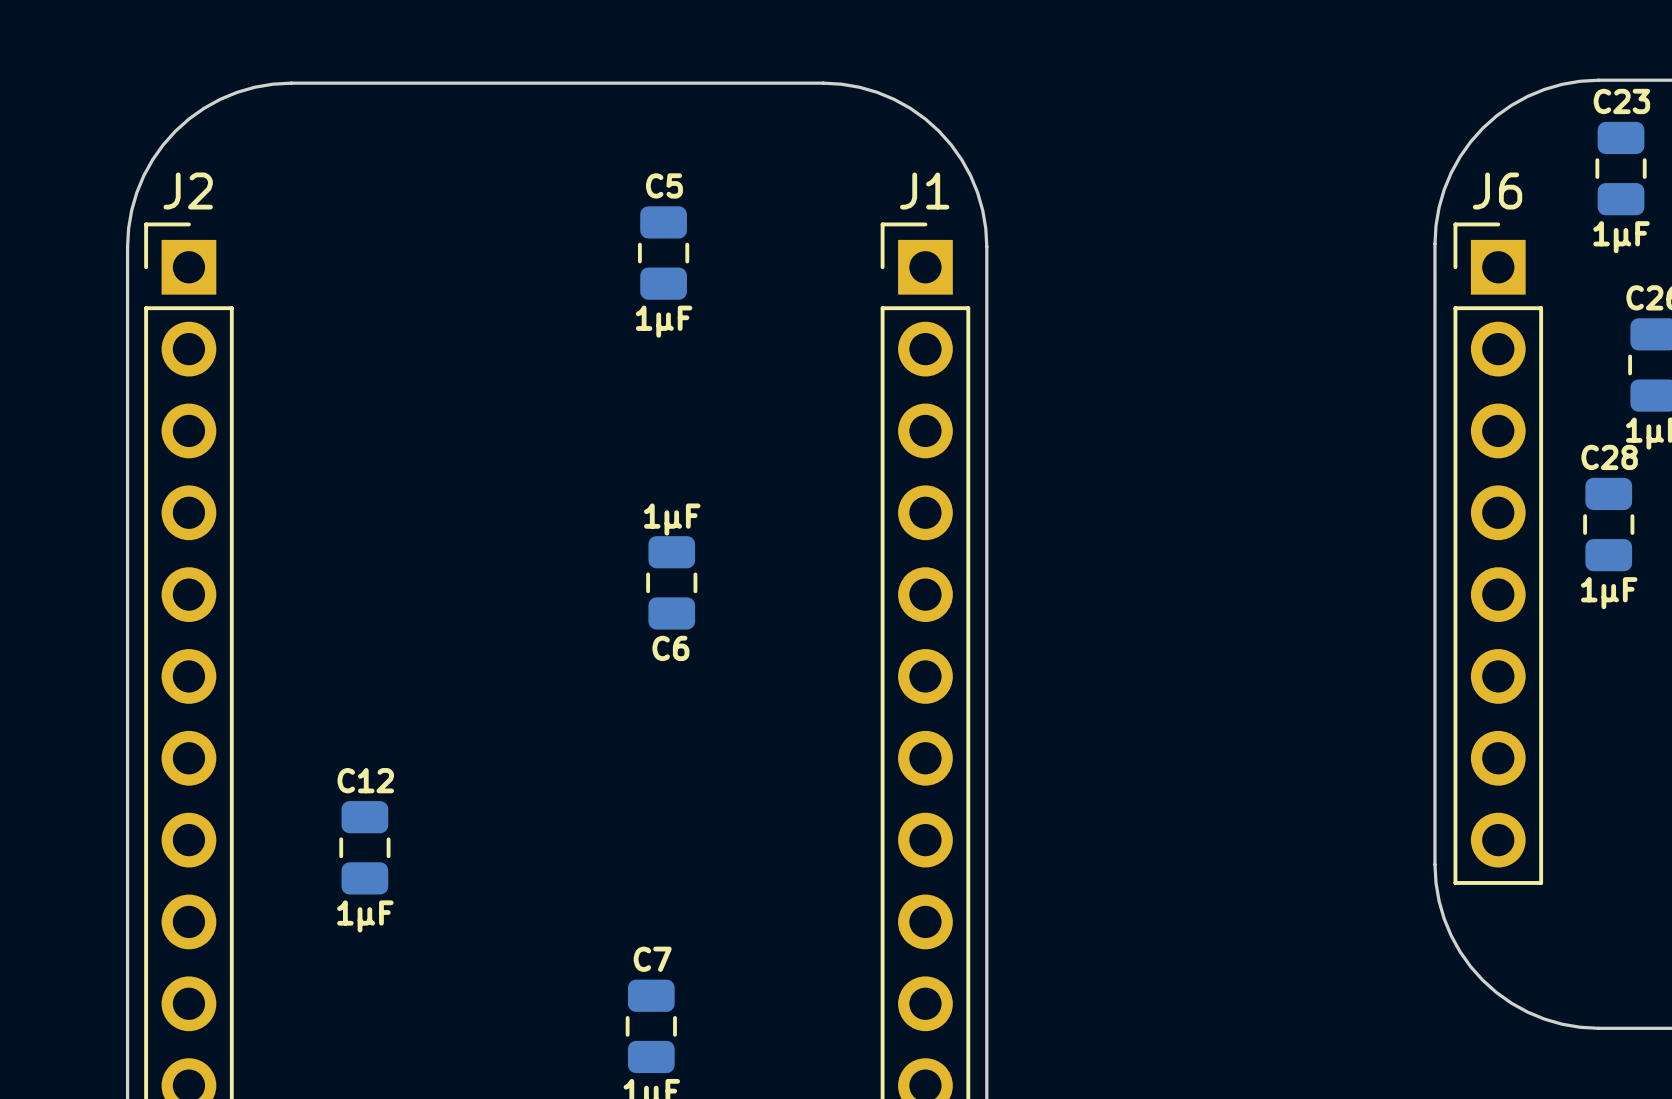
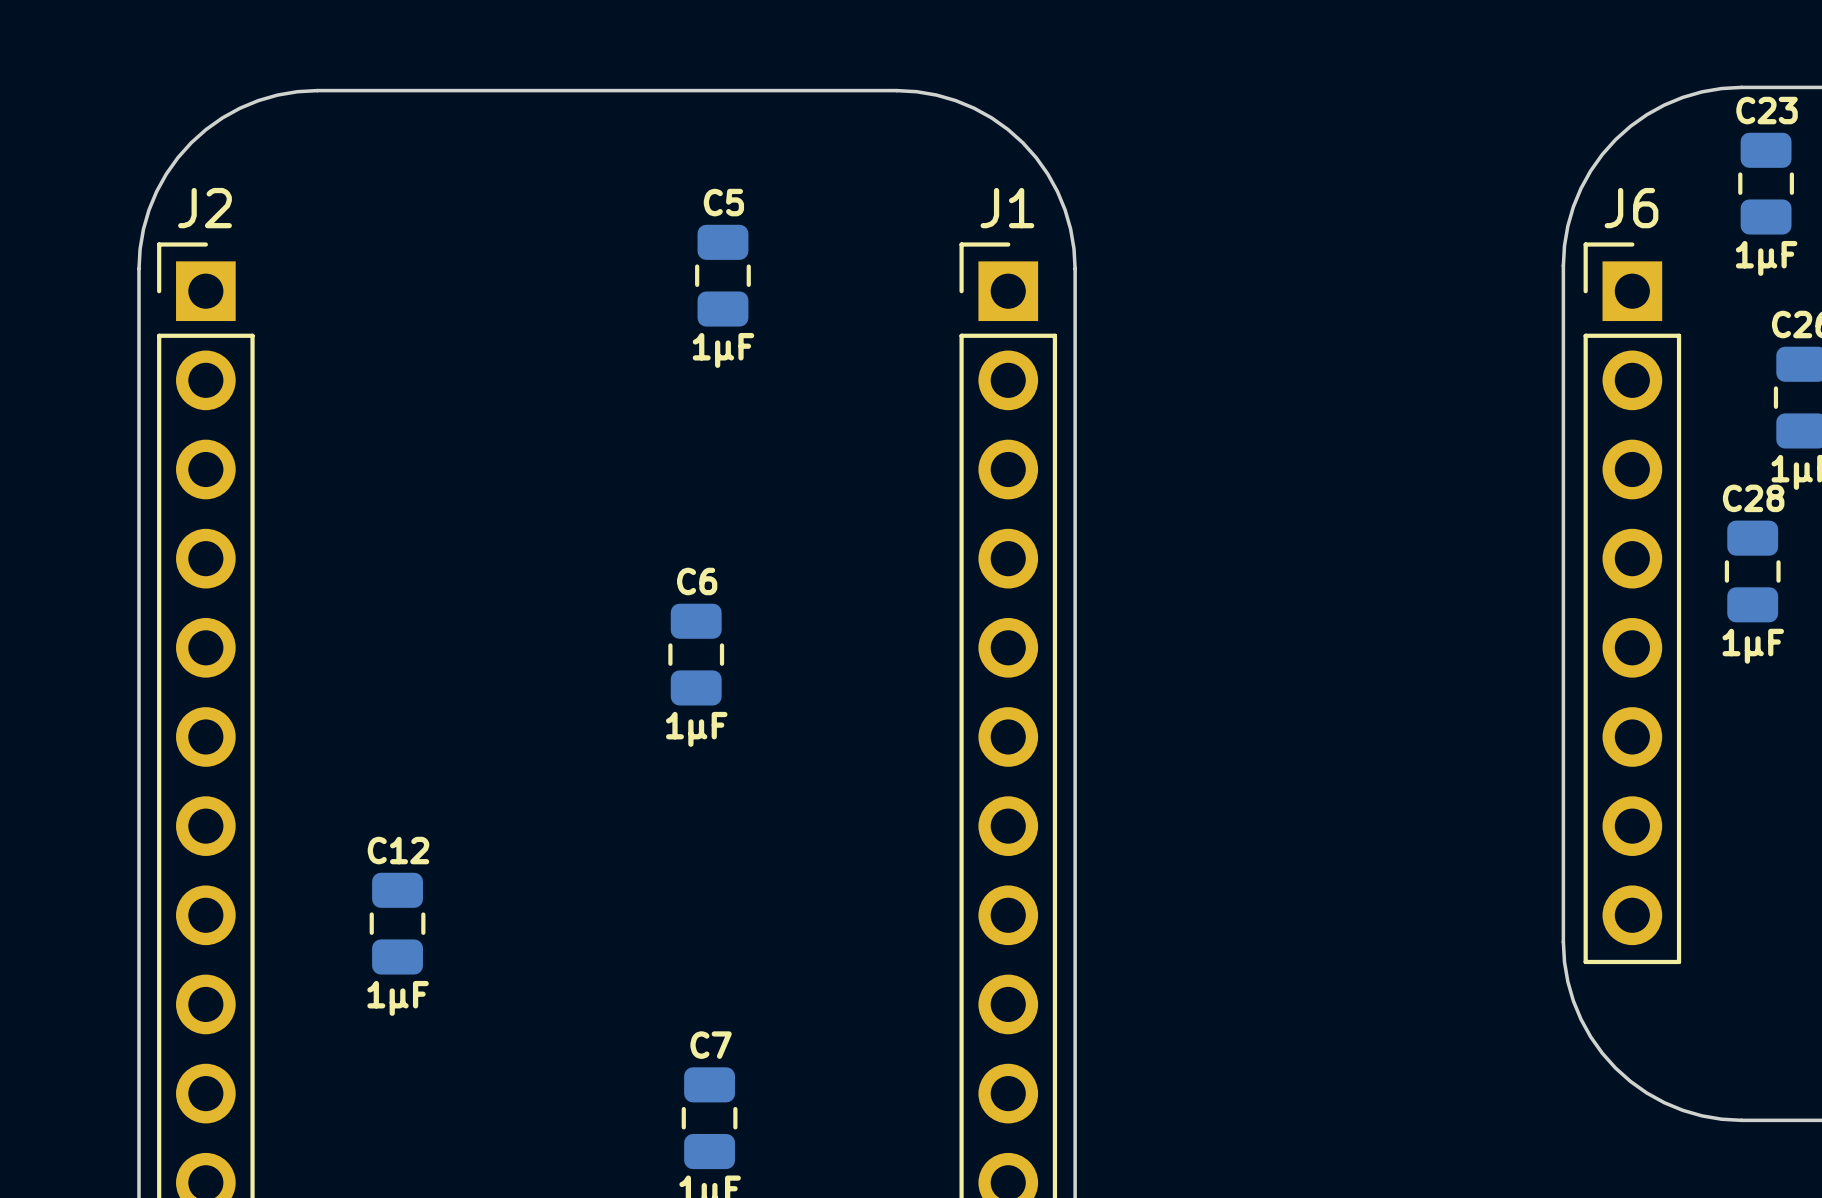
C6 value position: 1μF (672, 519) -> 1μF (696, 729)
C6 position: (671, 582) -> (696, 654)
C6 name position: C6 (670, 648) -> C6 (697, 581)

